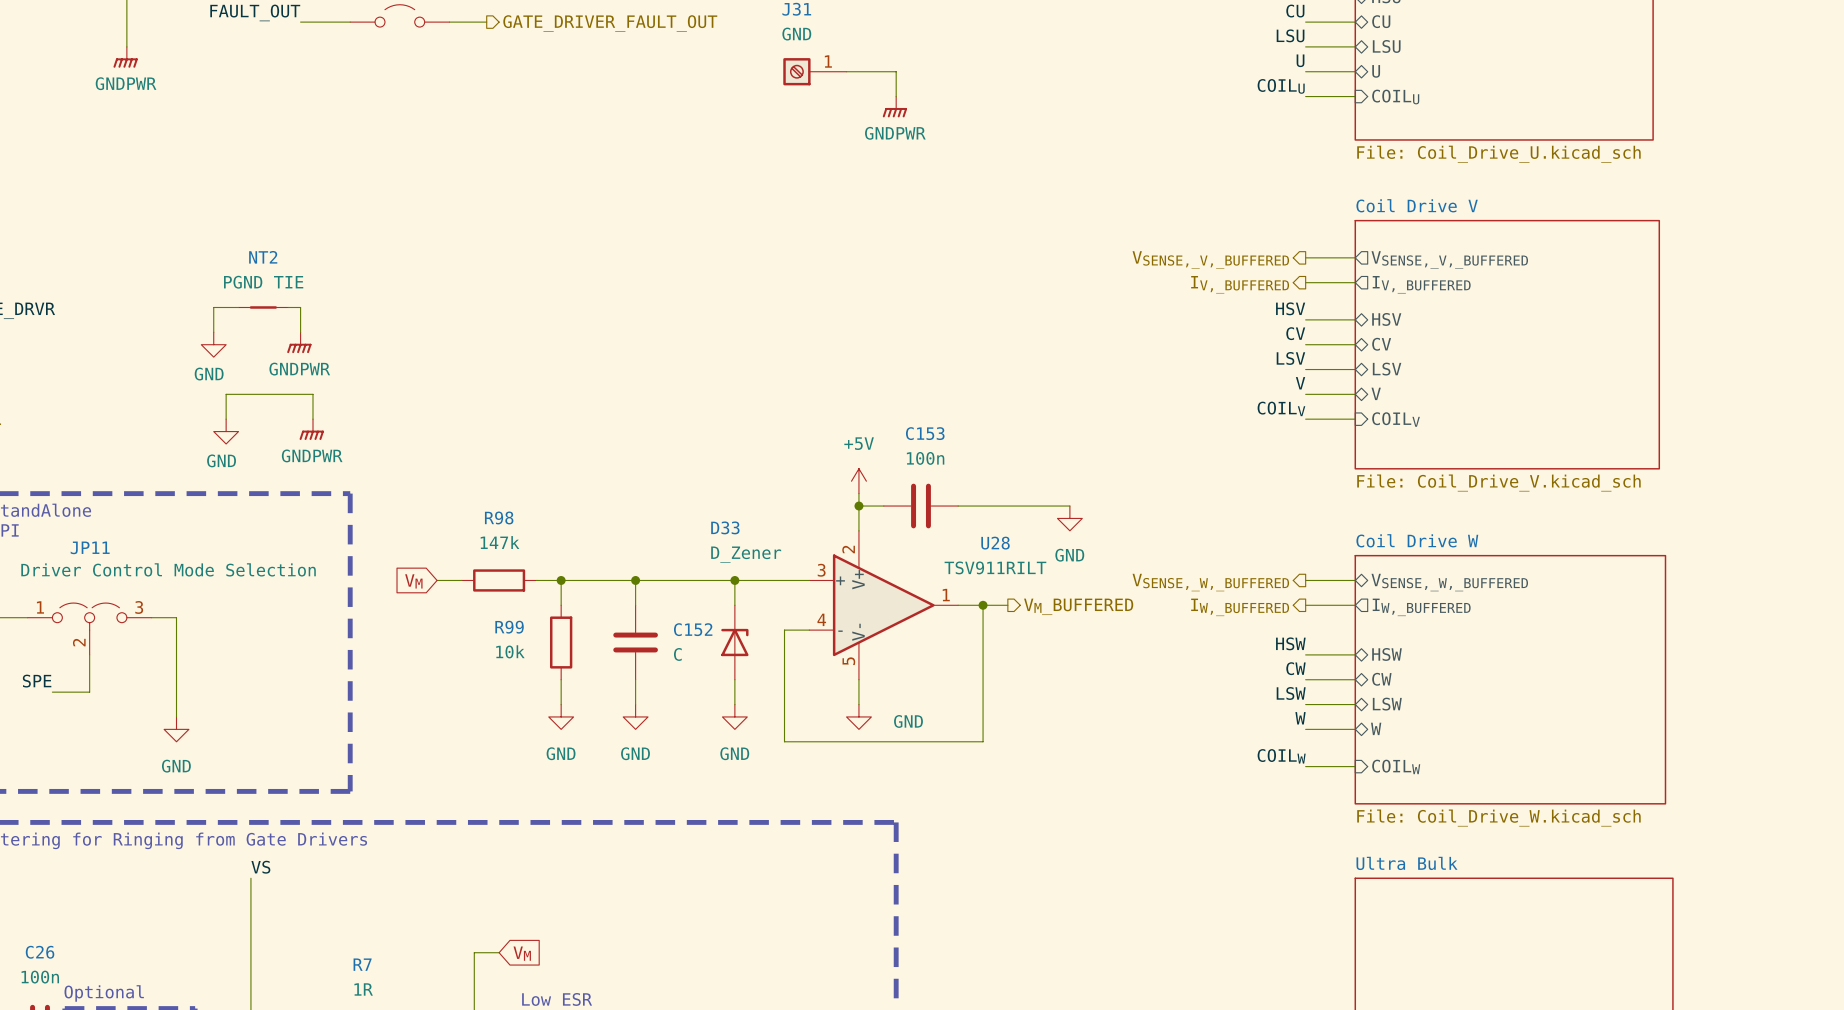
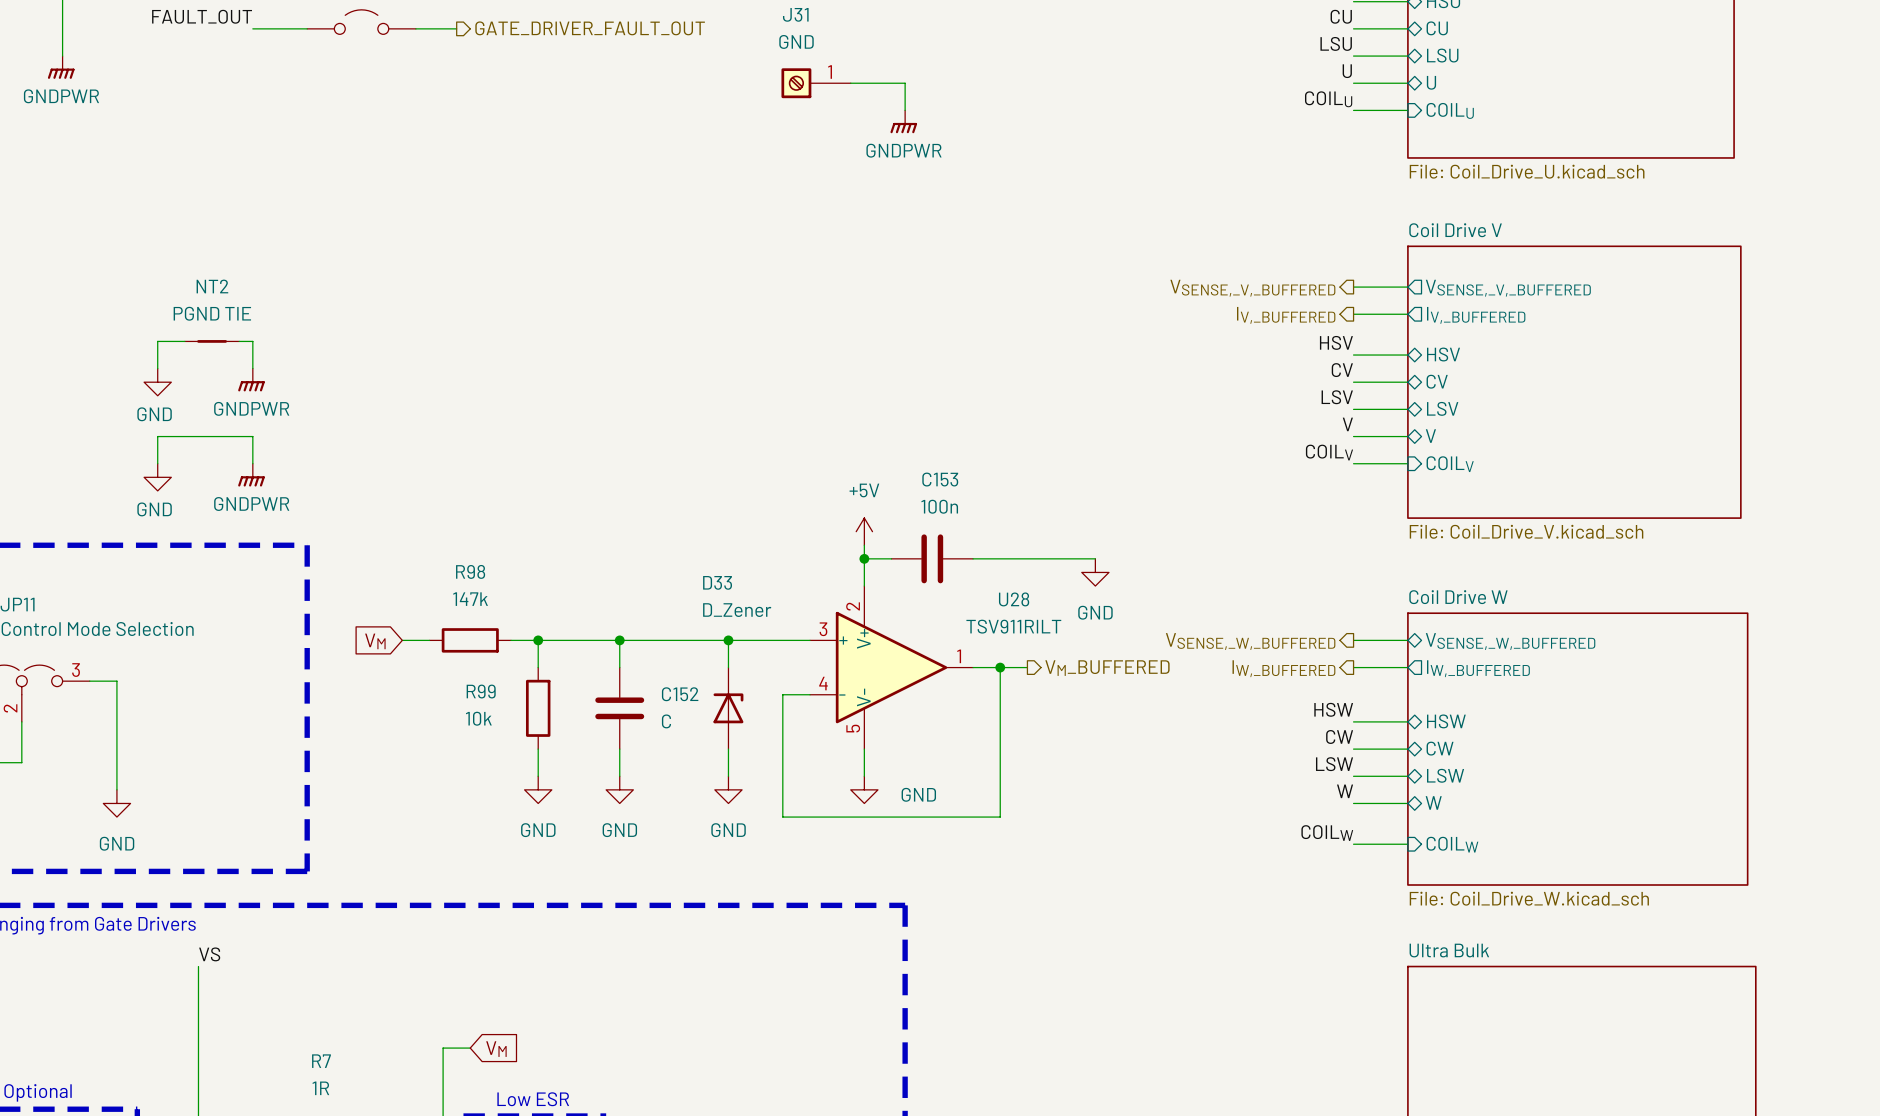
wire: (226, 394) (226, 419) -> (171, 436) (157, 436) (157, 463)
wire: (300, 394) (312, 394) (312, 419) -> (252, 436) (252, 463)
power symbol position: GNDPWR (311, 429) -> GNDPWR (251, 475)
power symbol position: GND (226, 431) -> GND (157, 477)

